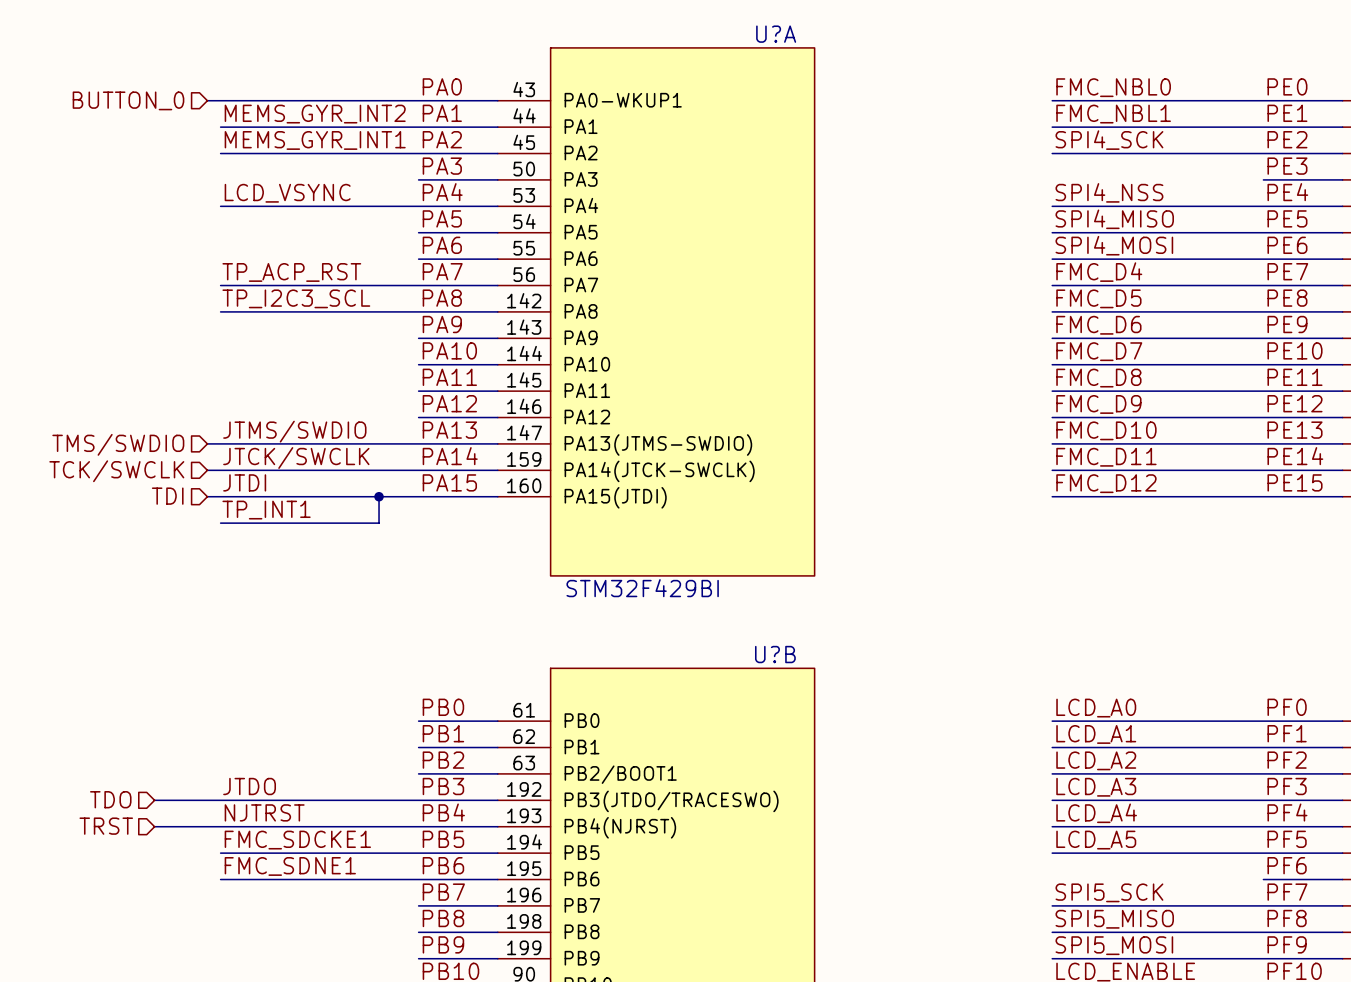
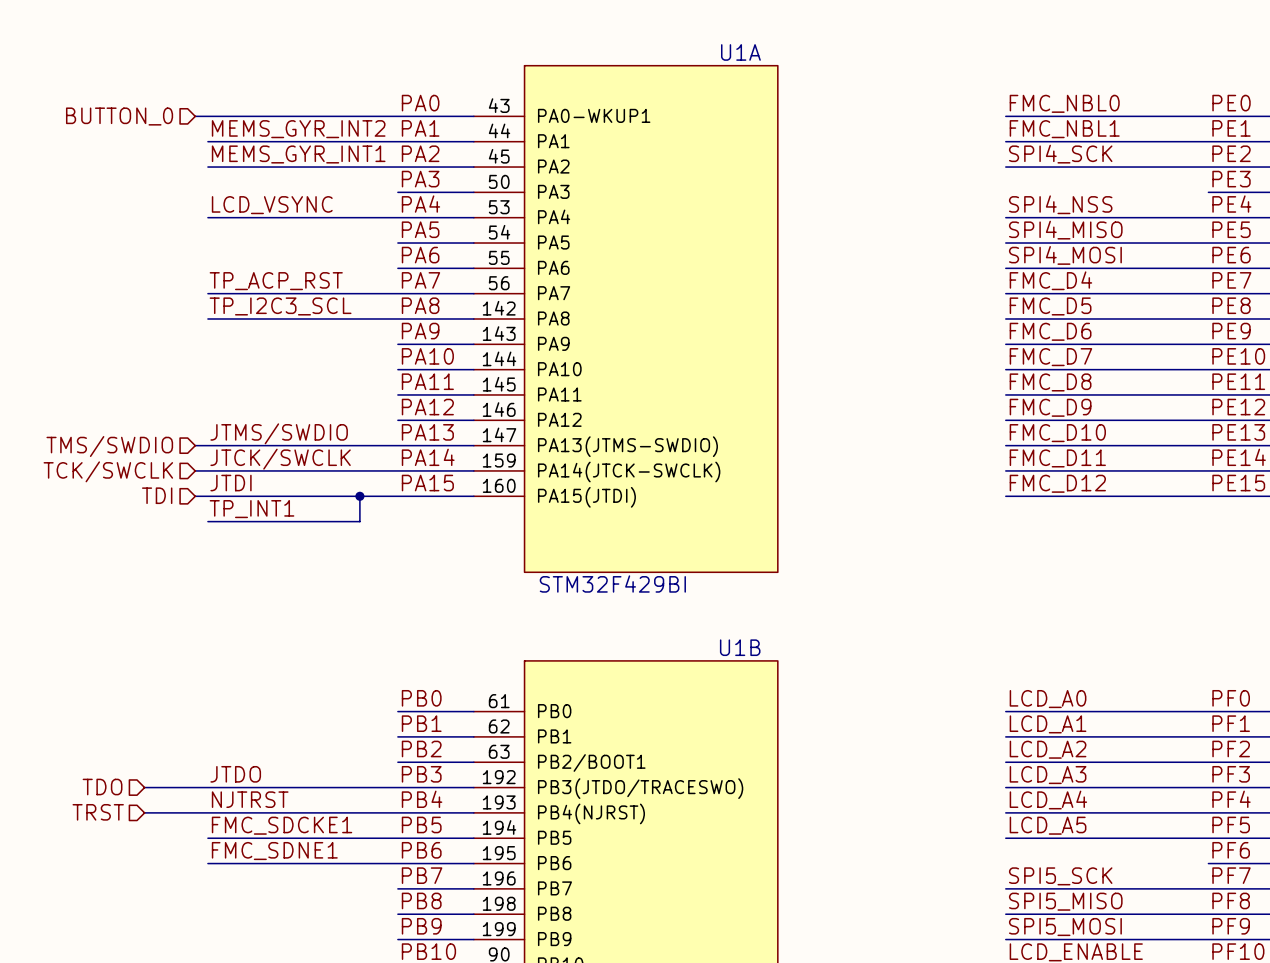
U?A name: U?A (776, 34) -> U1A (740, 52)
U?B name: U?B (775, 654) -> U1B (740, 647)

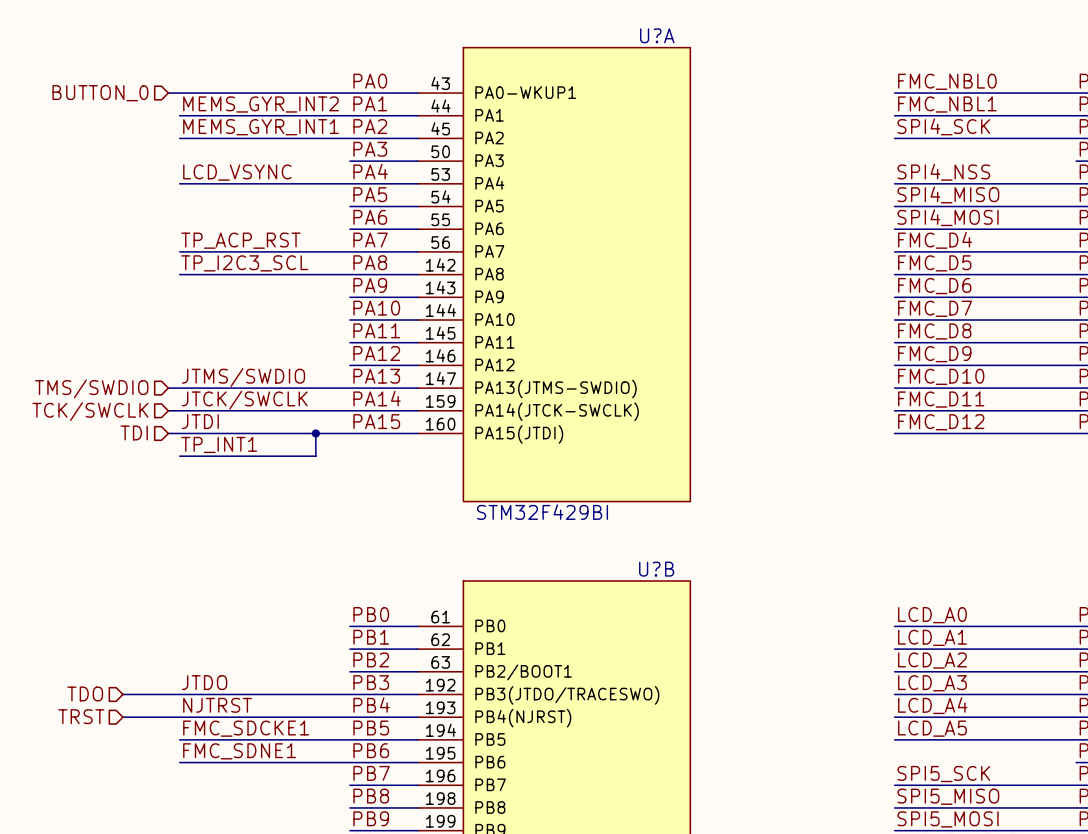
U1A name: U1A (740, 52) -> U?A (657, 35)
U1B name: U1B (740, 647) -> U?B (656, 569)

